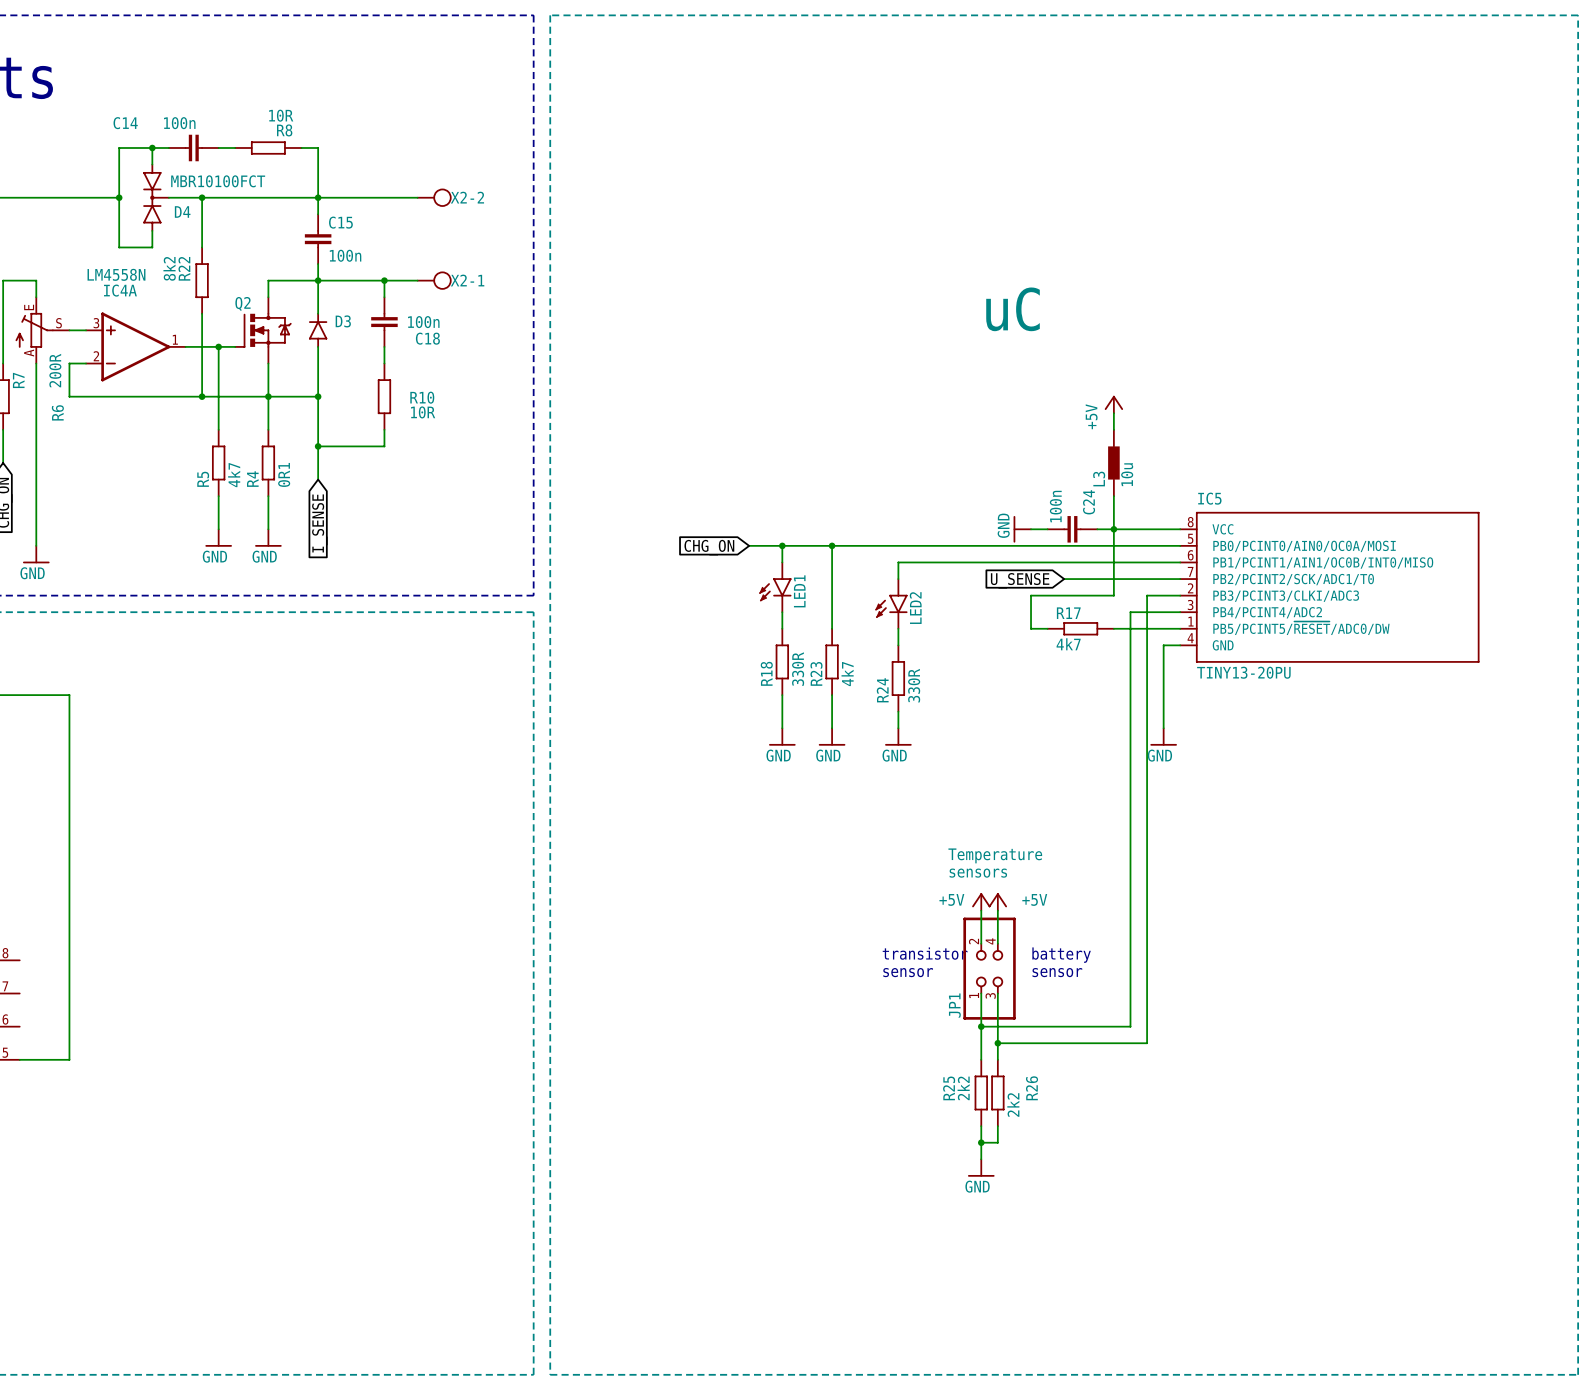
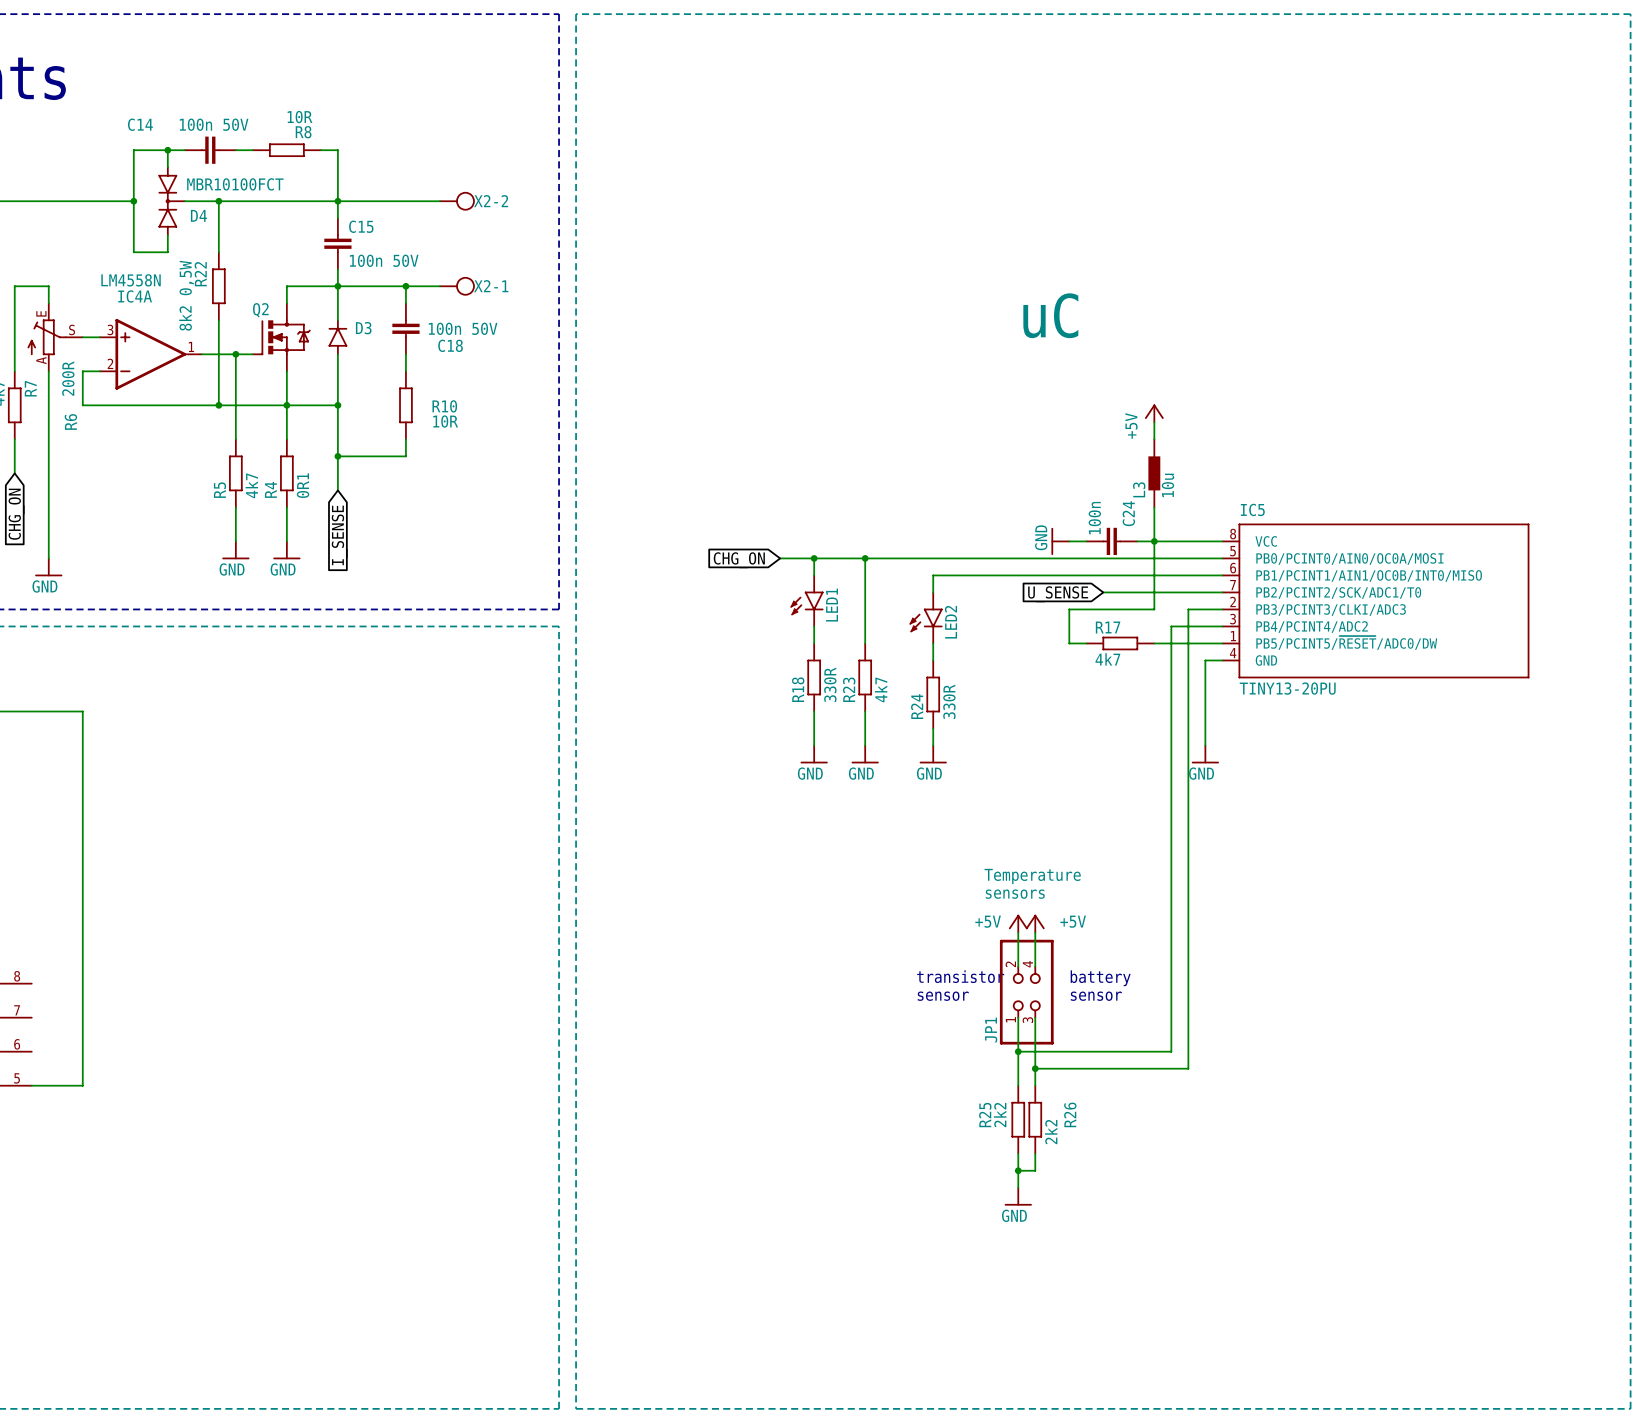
C14 value: 100n (179, 123) -> 100n 50V (214, 124)
C15 value: 100n (345, 255) -> 100n 50V (384, 260)
R22 value: 8k2 (169, 268) -> 8k2 0,5W (186, 295)
C18 value: 100n (423, 322) -> 100n 50V (463, 328)

